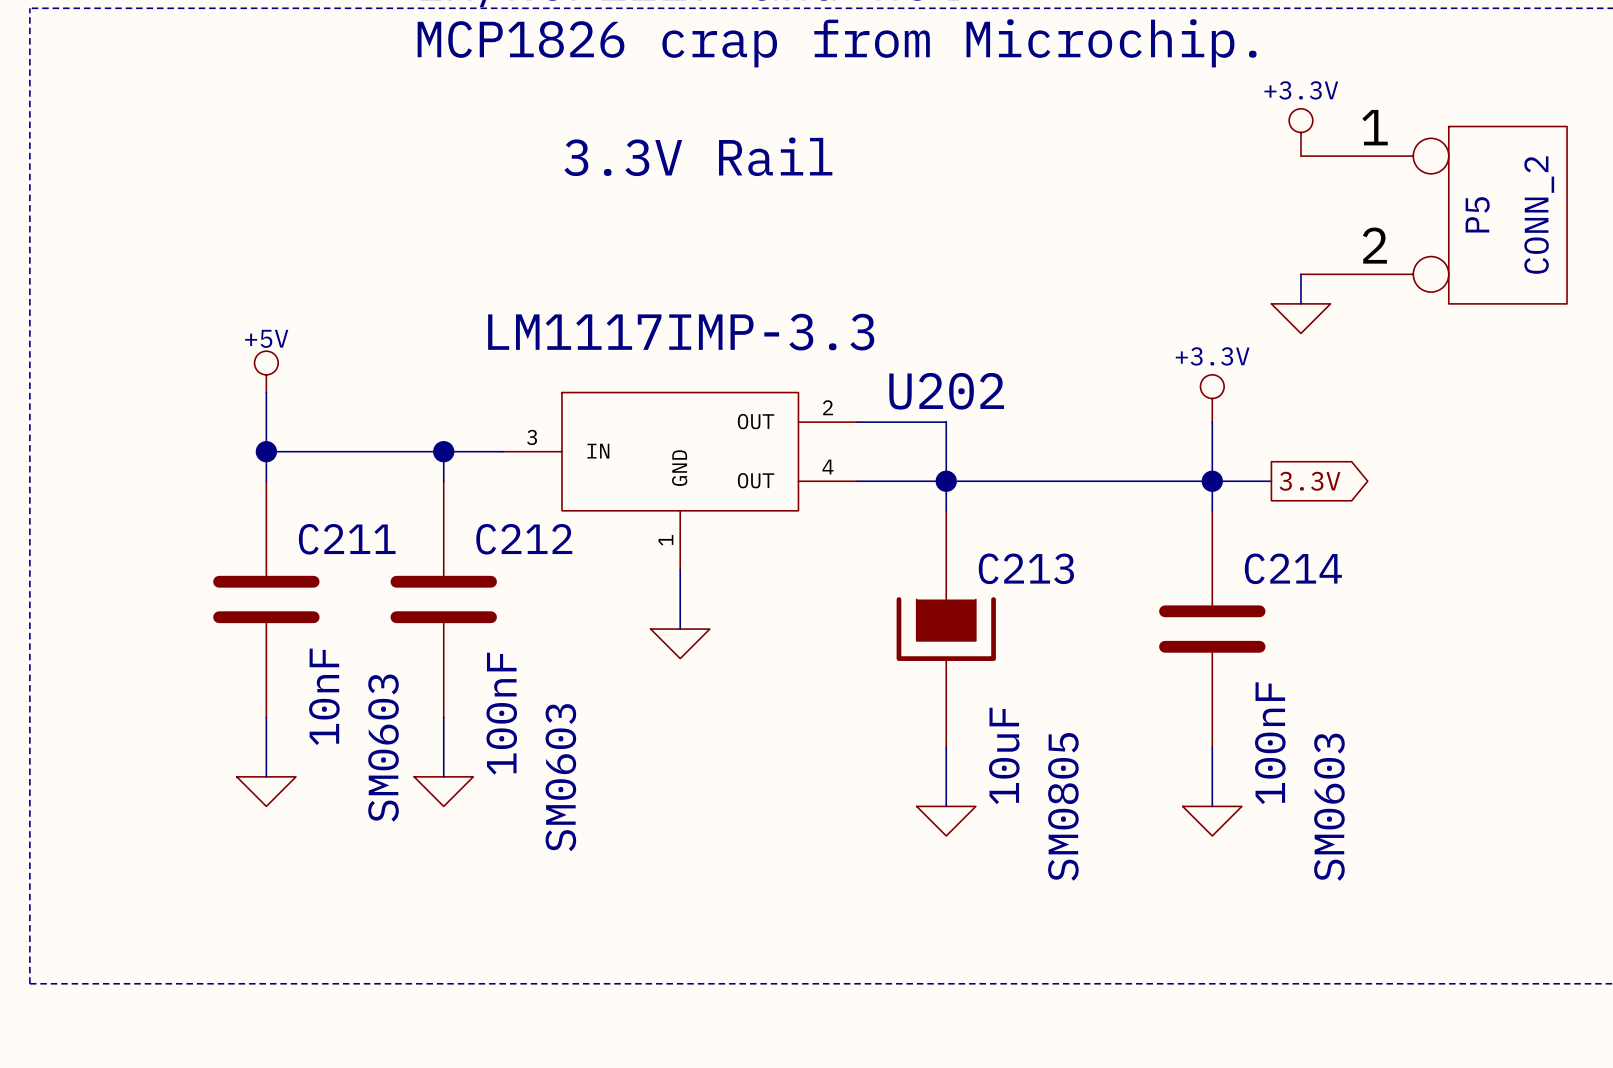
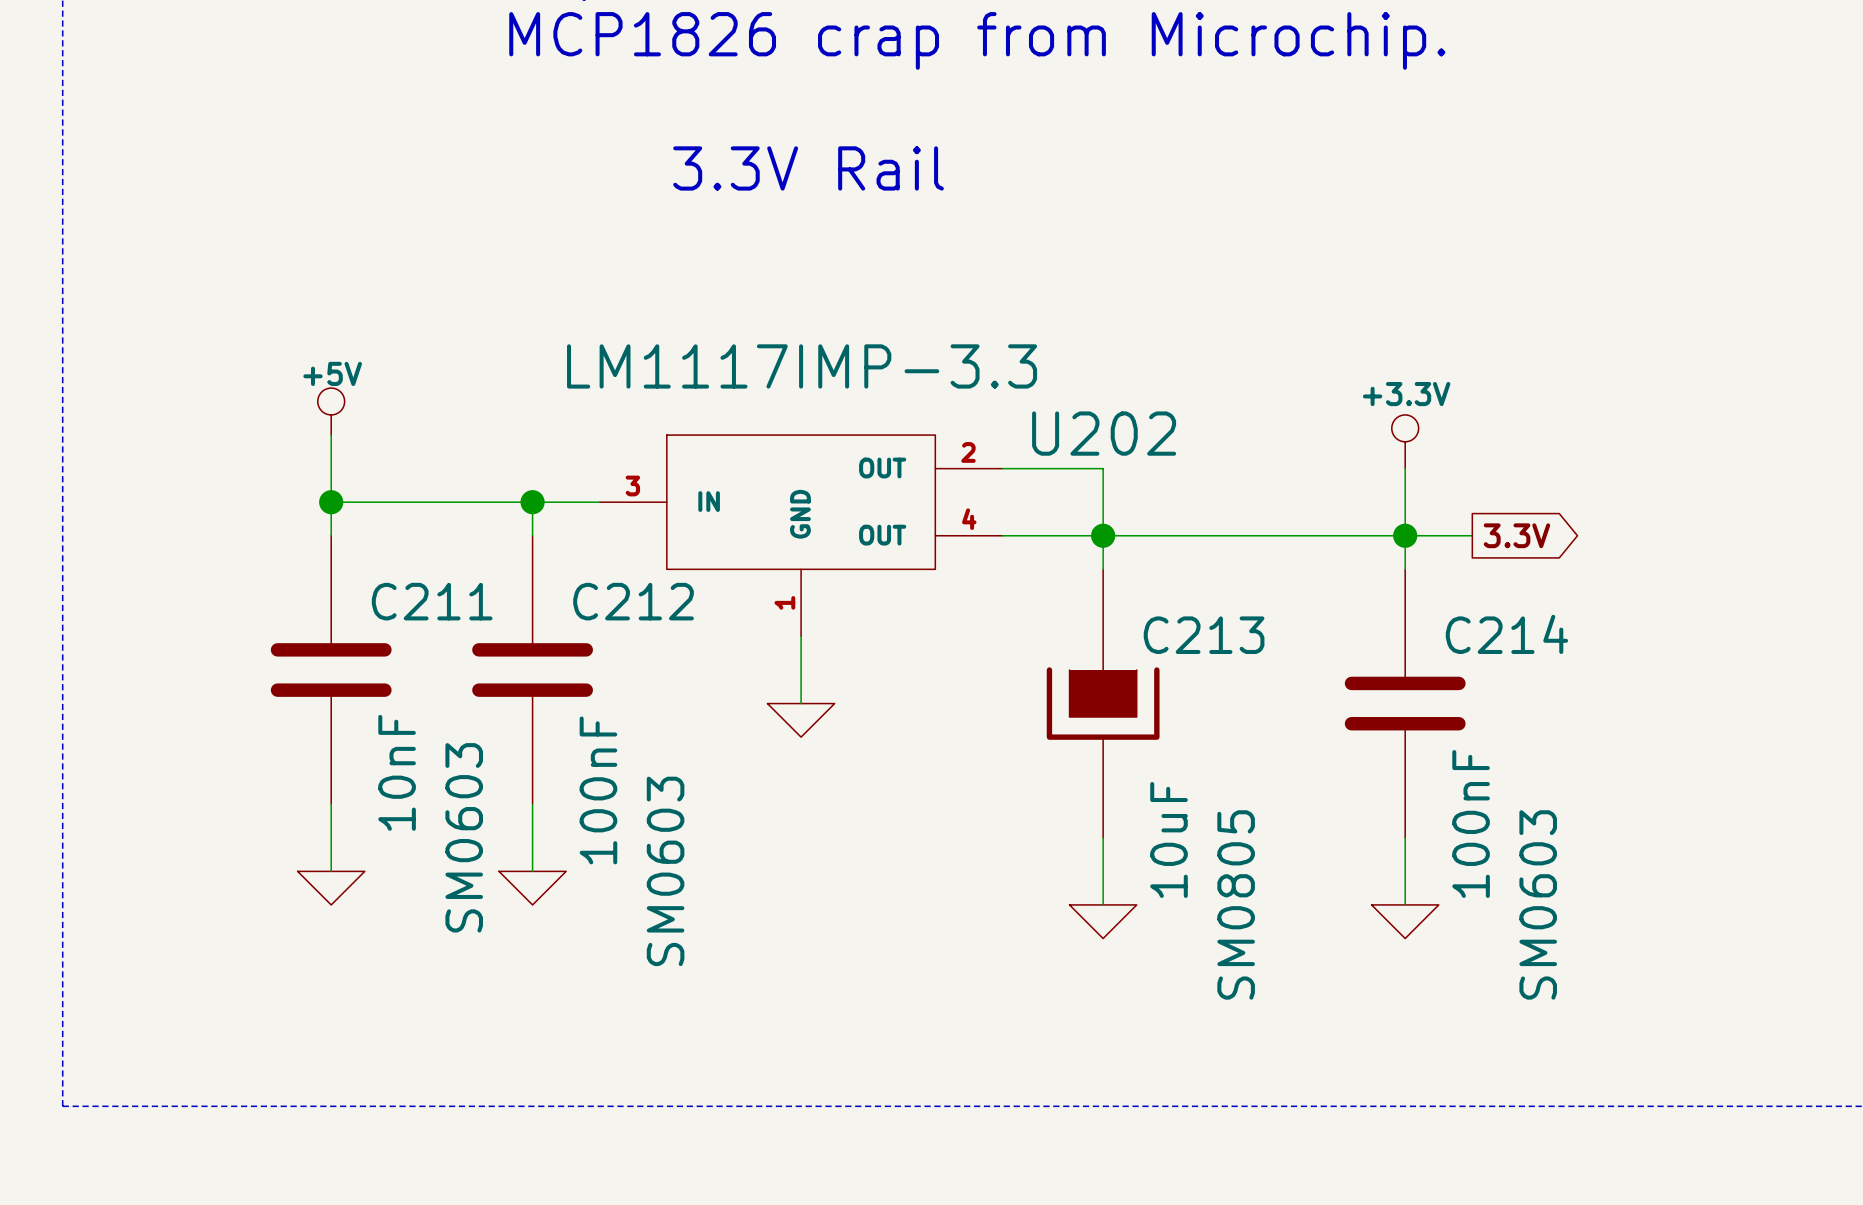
power symbol: +3.3V (1300, 132) -> none
P5: CONN_2 (1434, 215) -> none
wire: (1300, 274) (1300, 303) -> none
power symbol: (1300, 318) -> none

